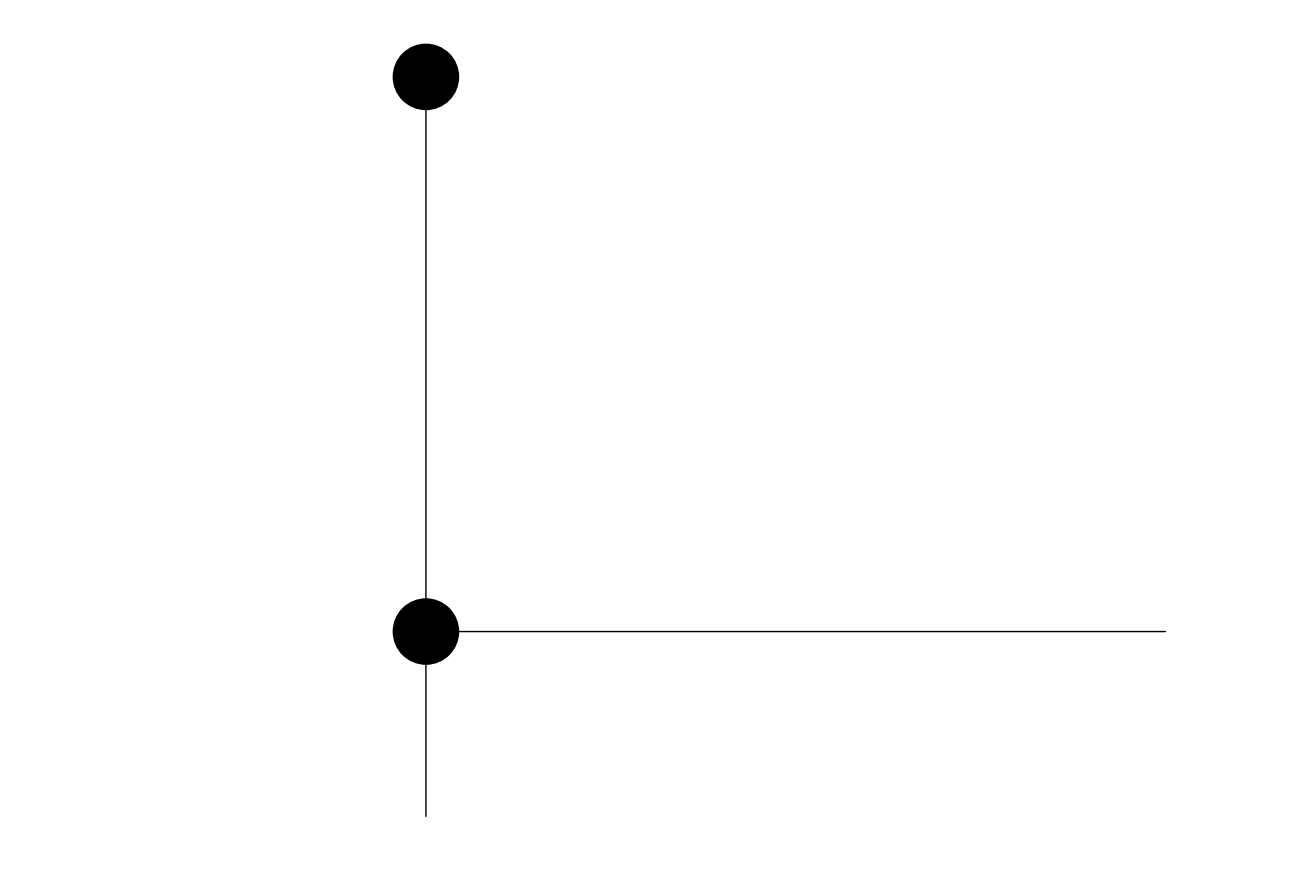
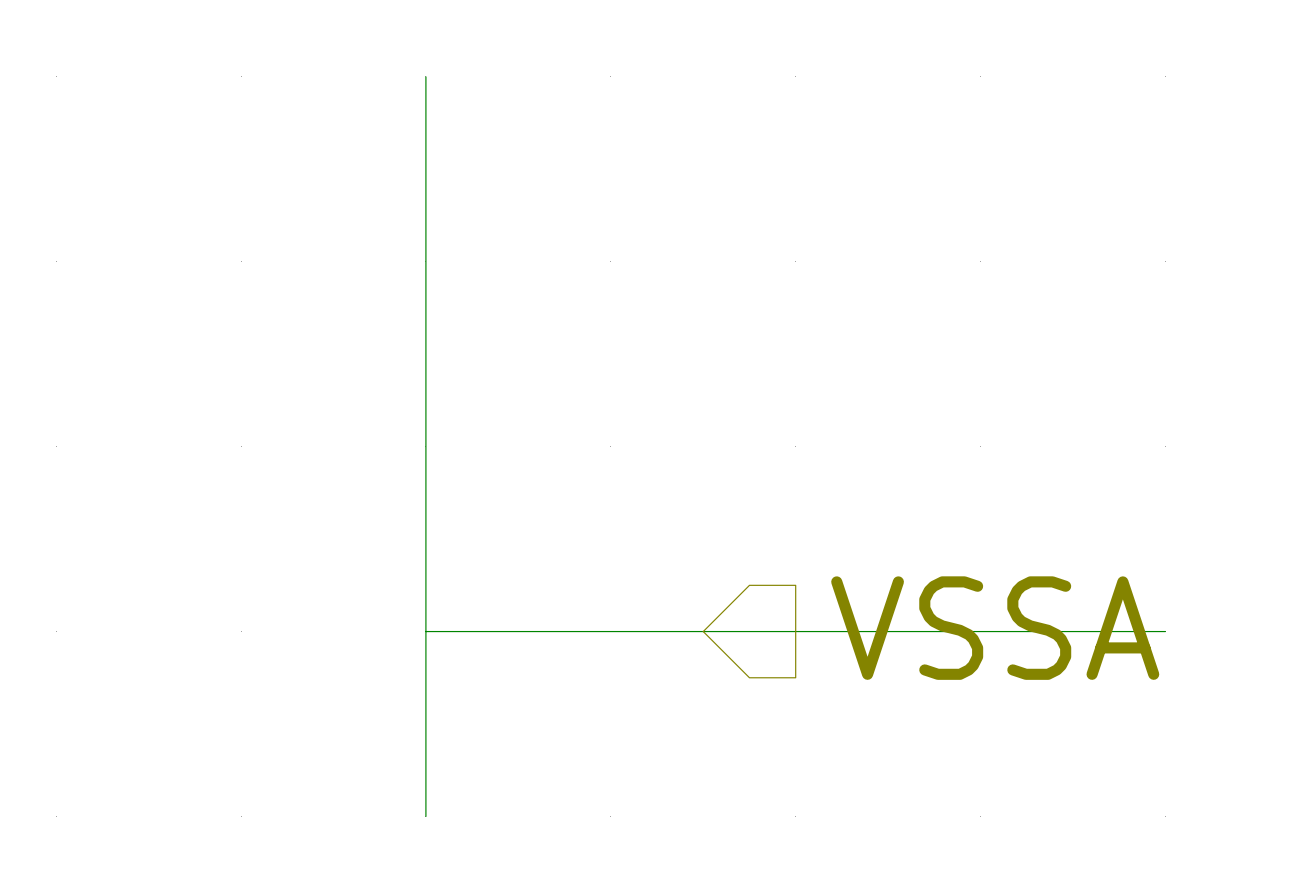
junction: (425, 76) -> none
hierarchical label: none -> VSSA (995, 628)
junction: (425, 631) -> none

